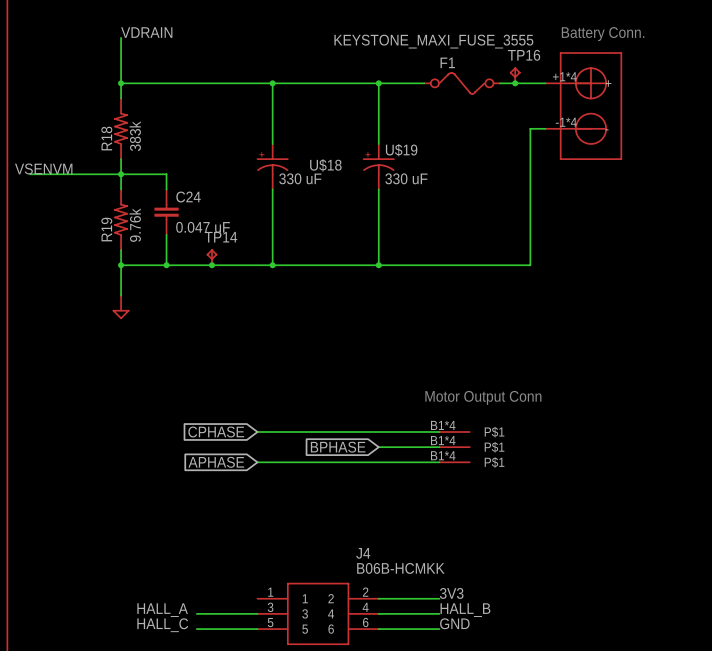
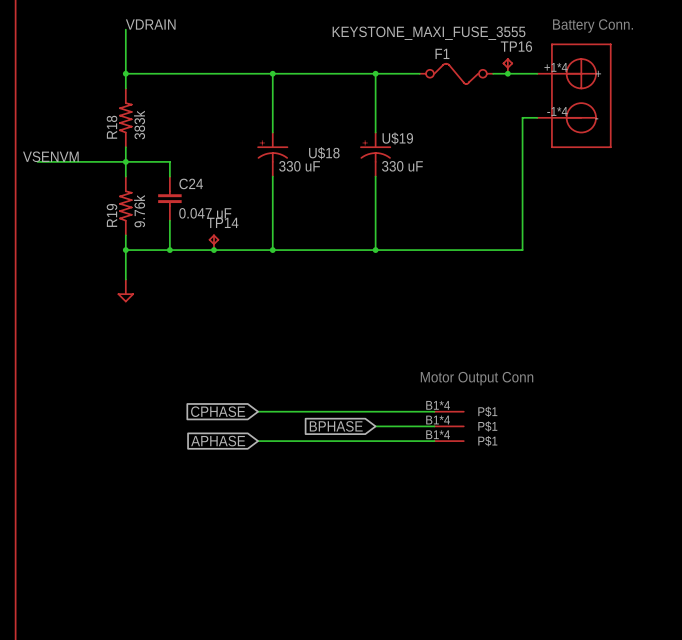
label: 3V3 (451, 593) -> none
wire: (378, 598) (439, 598) -> none
label: HALL_A (162, 610) -> none
label: HALL_B (465, 610) -> none
wire: (196, 613) (257, 613) -> none
J4: B06B-HCMKK (318, 613) -> none
wire: (378, 613) (439, 613) -> none
label: GND (454, 623) -> none
label: HALL_C (162, 625) -> none
wire: (196, 629) (257, 629) -> none
wire: (378, 629) (439, 629) -> none

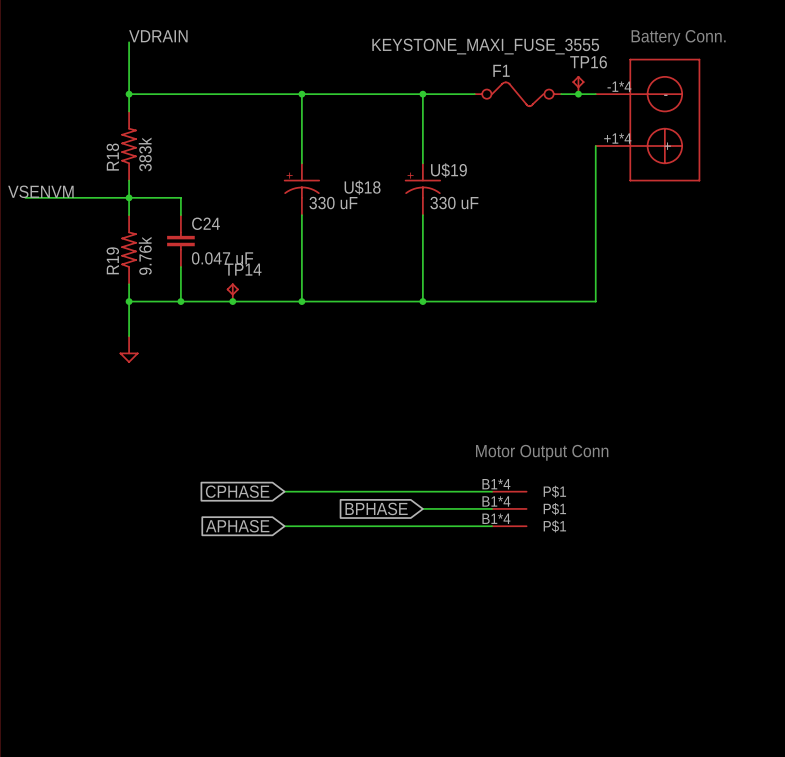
part: none -> (648, 120)
part: (574, 95) -> none

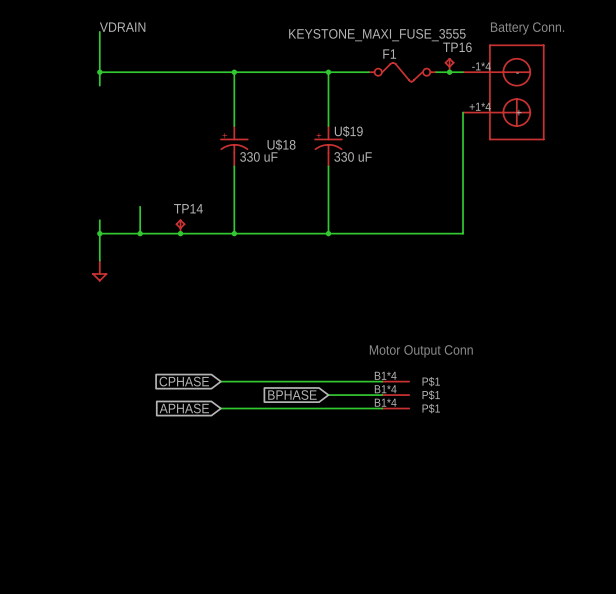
R18: 383k (129, 146) -> none
wire: (129, 180) (129, 215) -> none
label: VSENVM (40, 191) -> none
wire: (25, 197) (180, 197) (180, 215) -> none
junction: (129, 197) -> none
C24: 0.047 uF (180, 241) -> none
R19: 9.76k (129, 249) -> none

